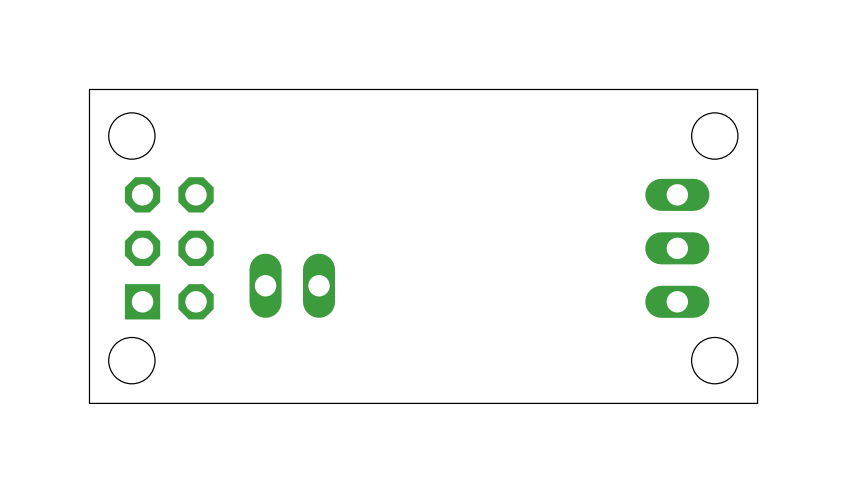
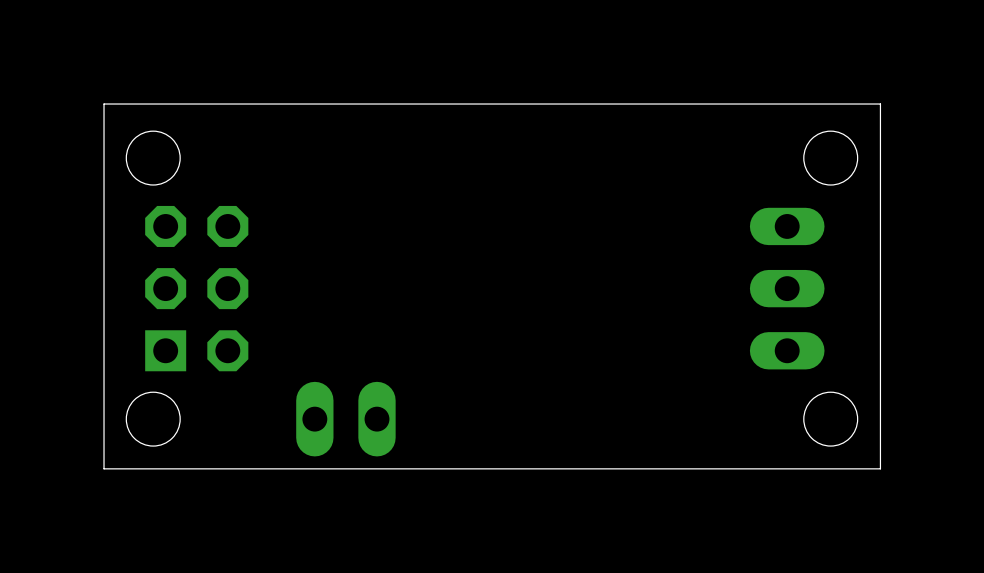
part position: (292, 285) -> (345, 419)

